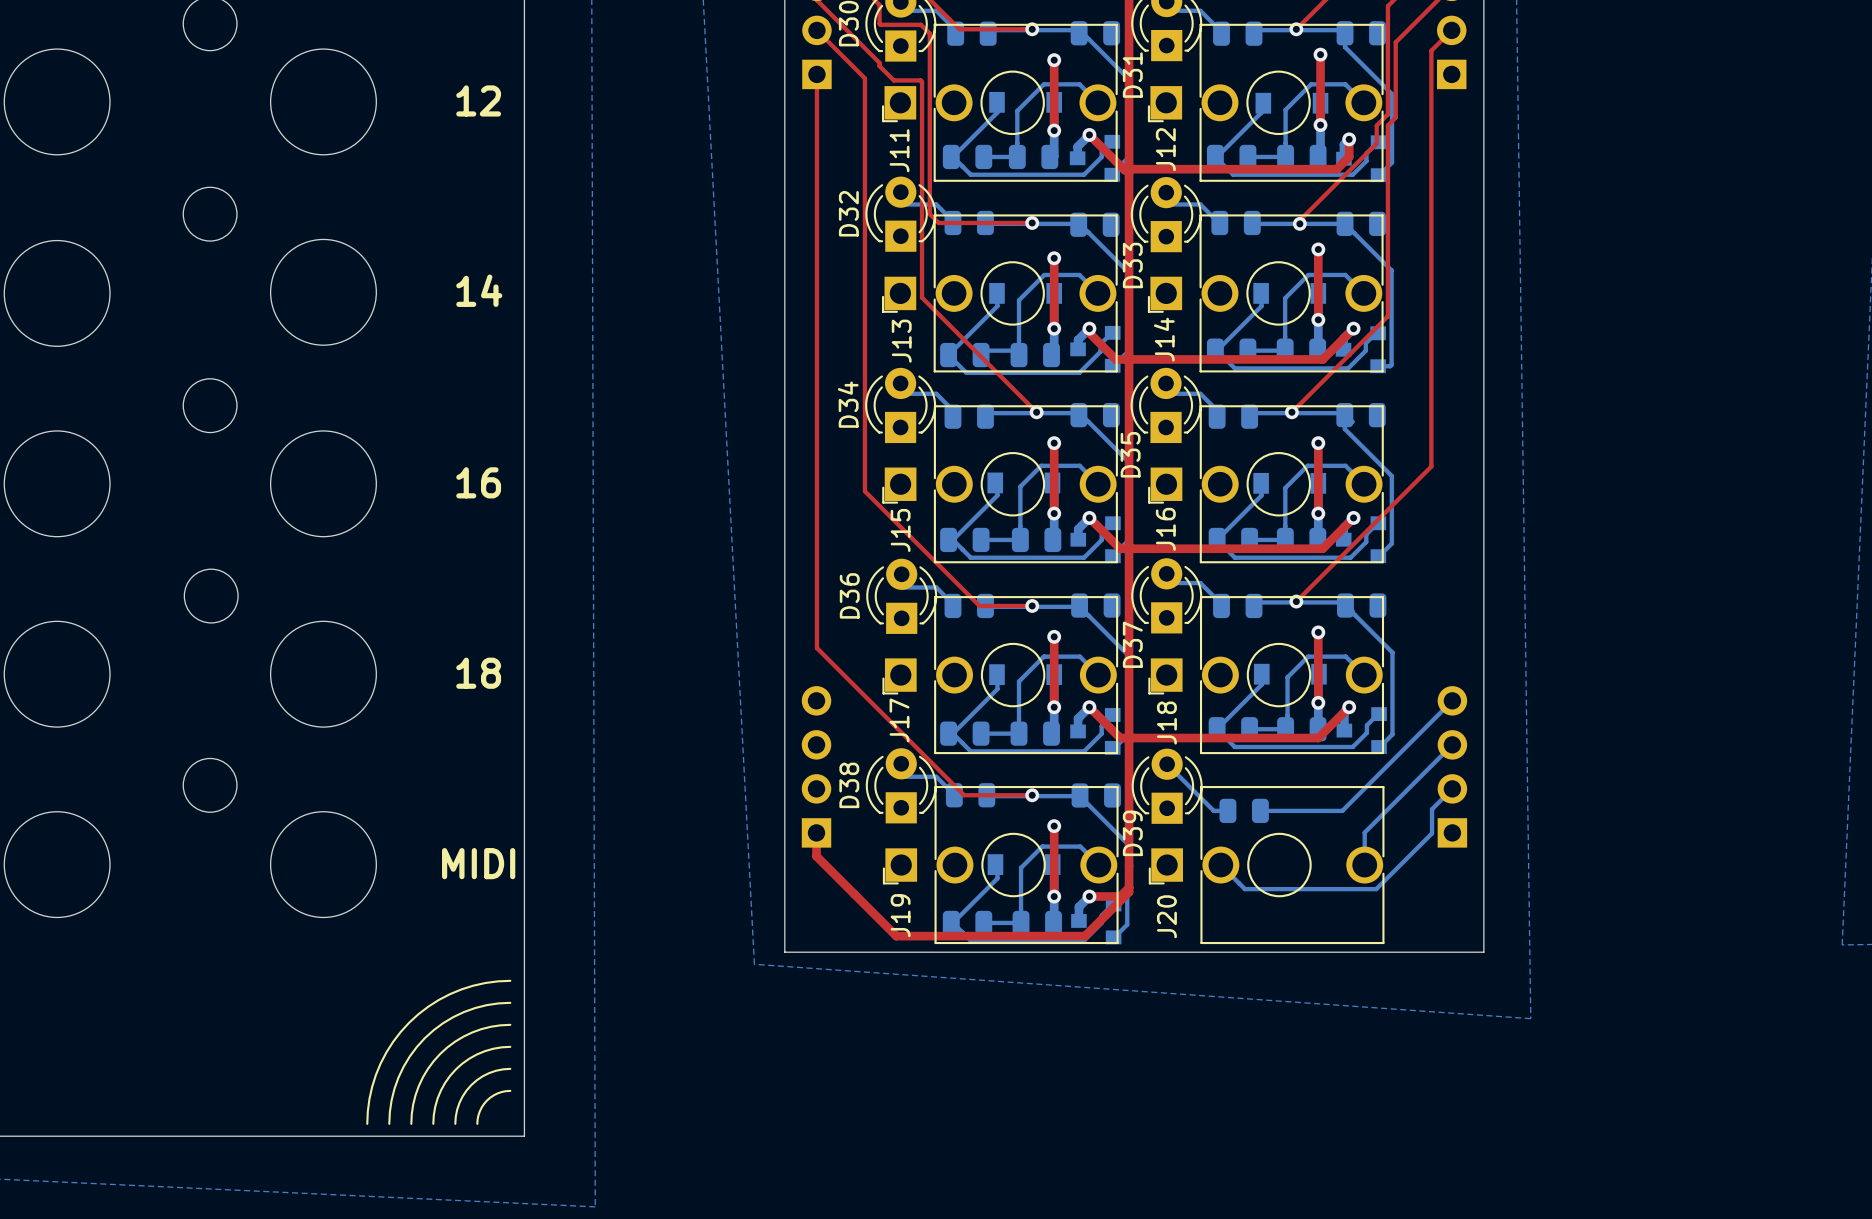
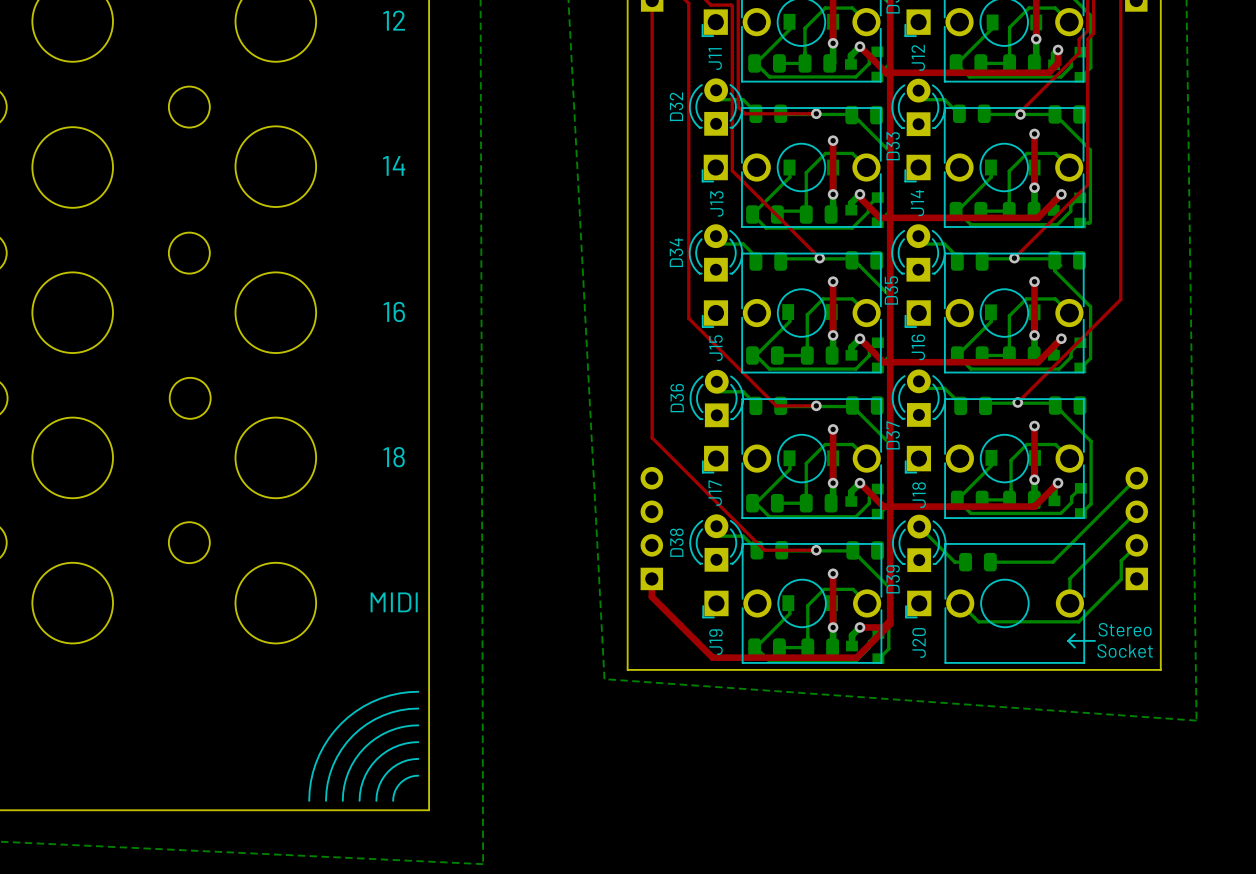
text: none -> Stereo (1125, 629)
line: none -> (1074, 634) (1068, 640)
line: none -> (1068, 640) (1074, 647)
line: none -> (1068, 640) (1095, 640)
text: none -> Socket (1125, 651)

